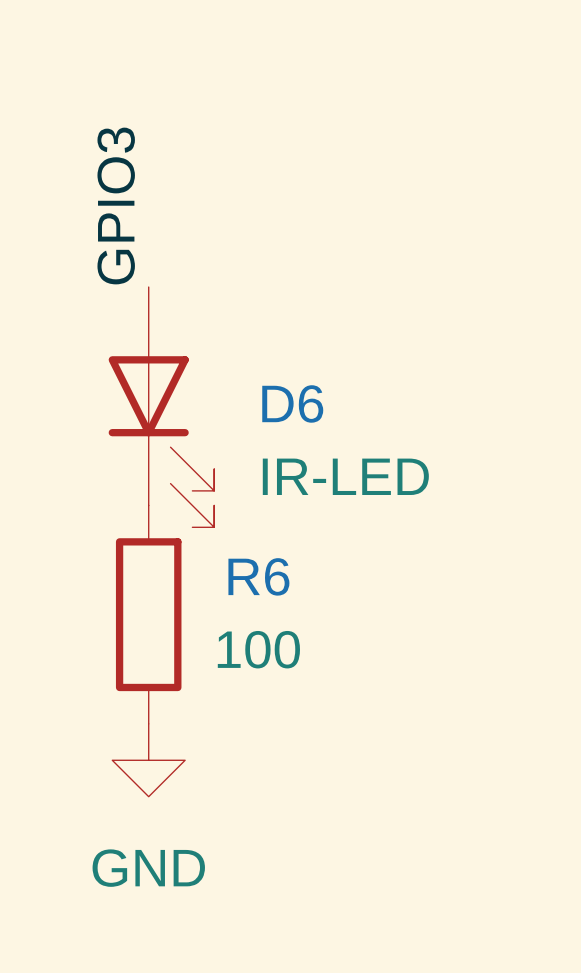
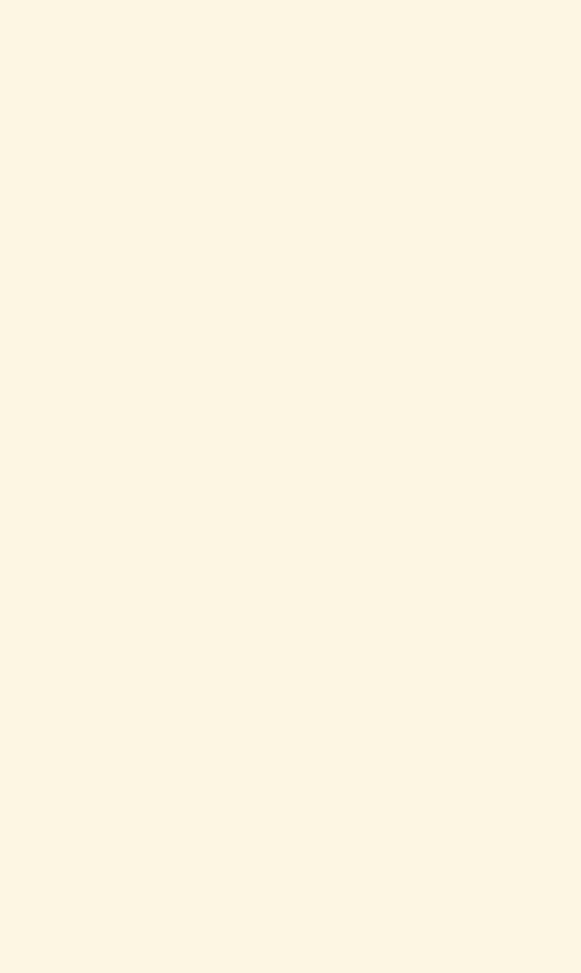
label: GPIO3 (116, 206) -> none
D6: IR-LED (161, 407) -> none
R6: 100 (148, 614) -> none
power symbol: GND (148, 760) -> none

